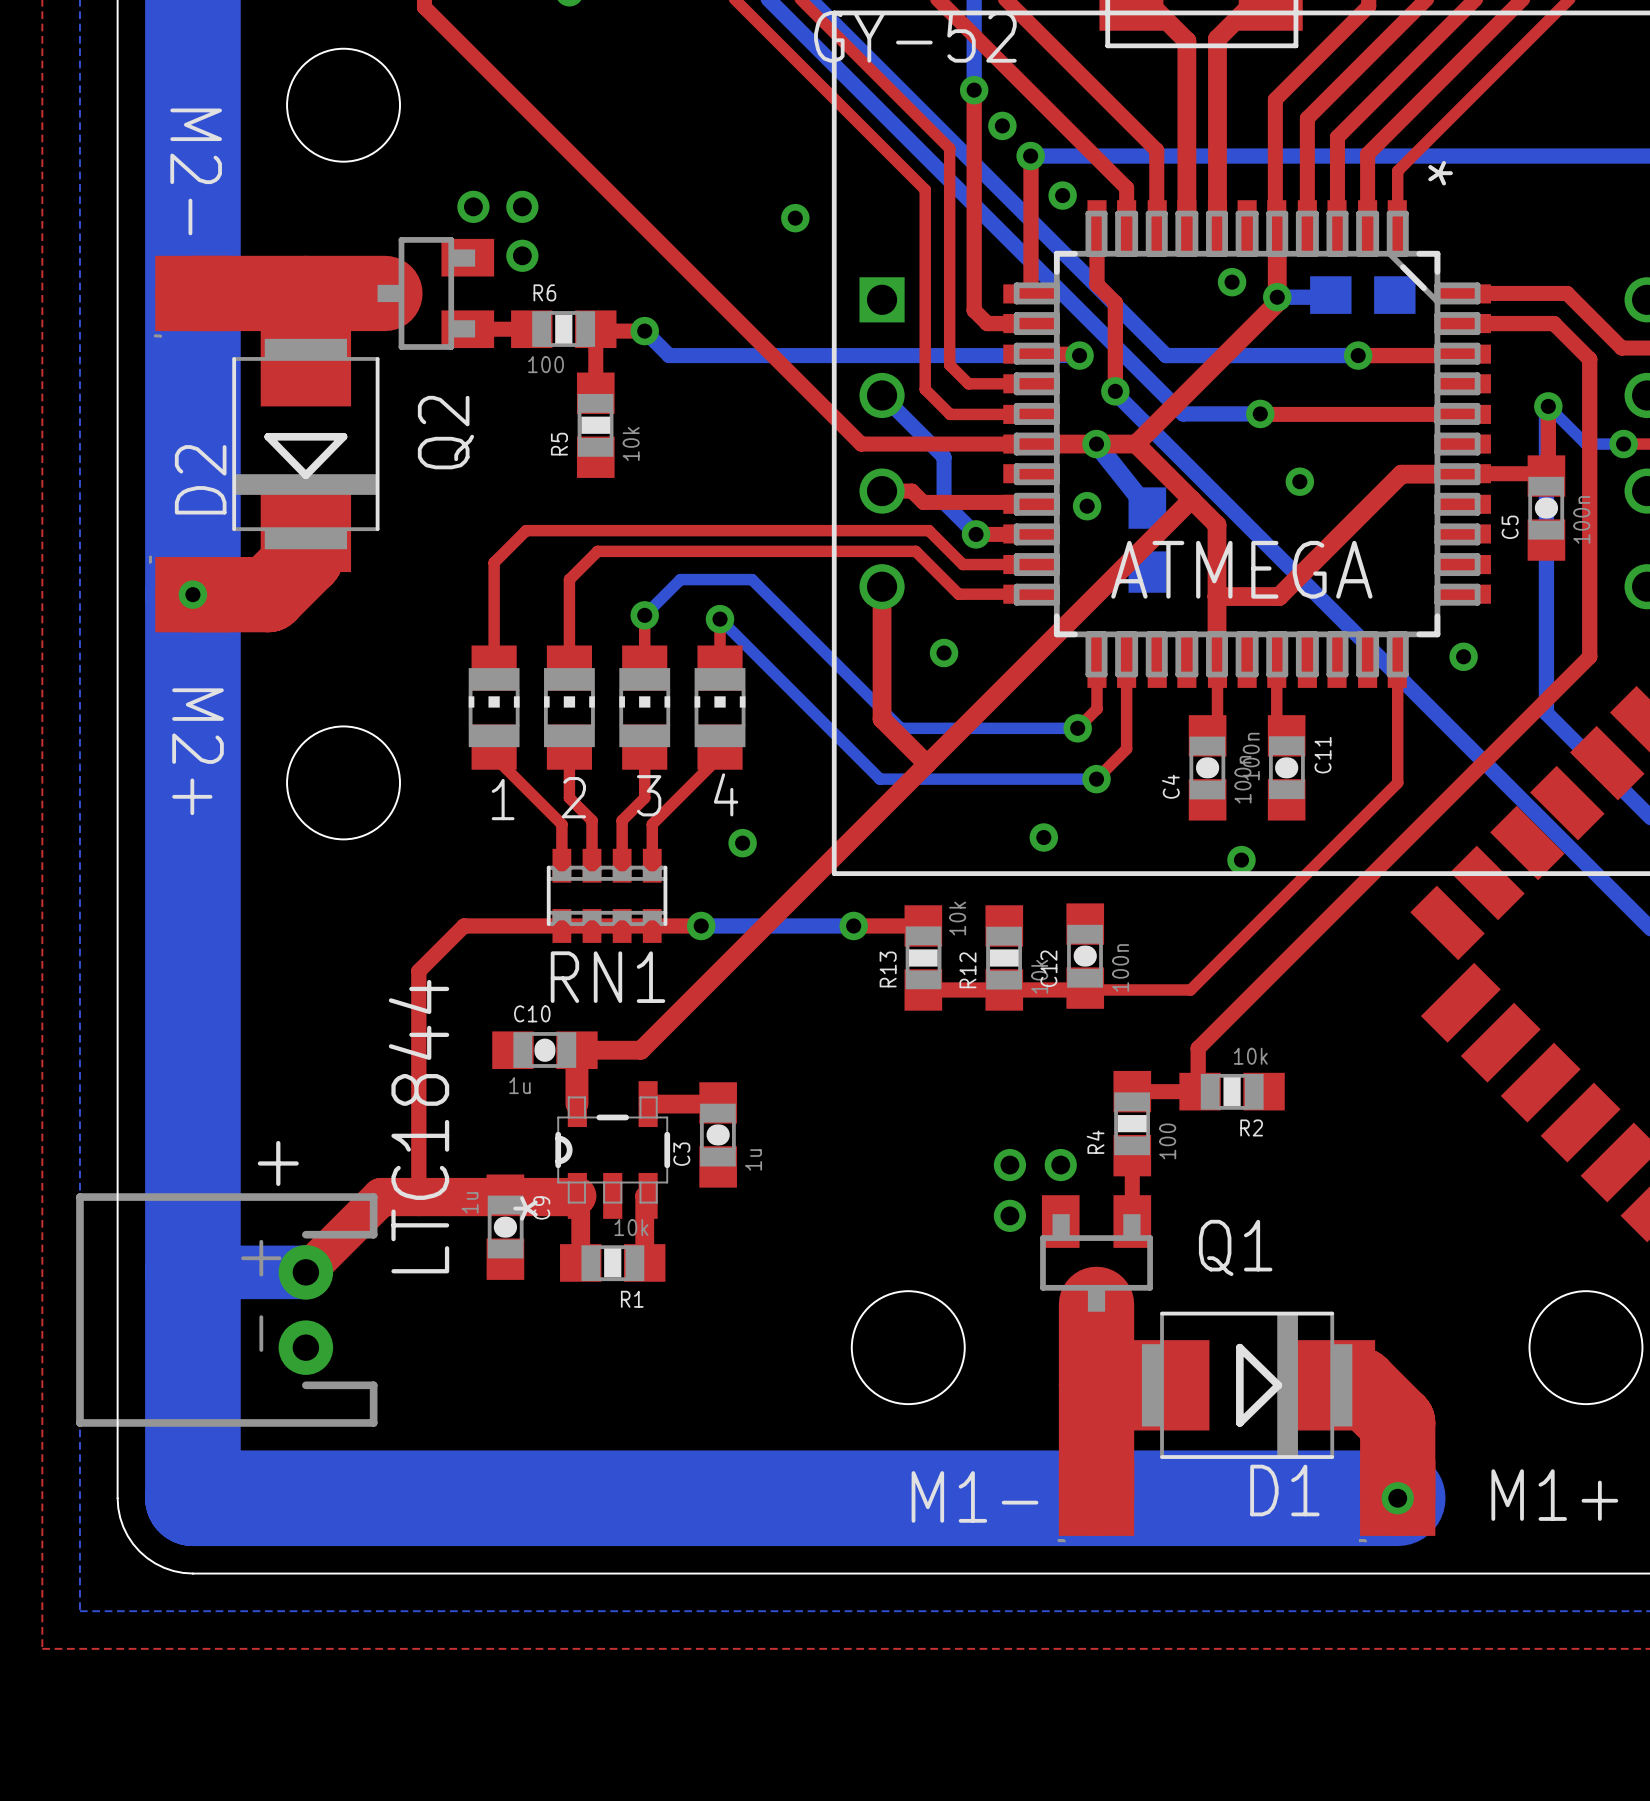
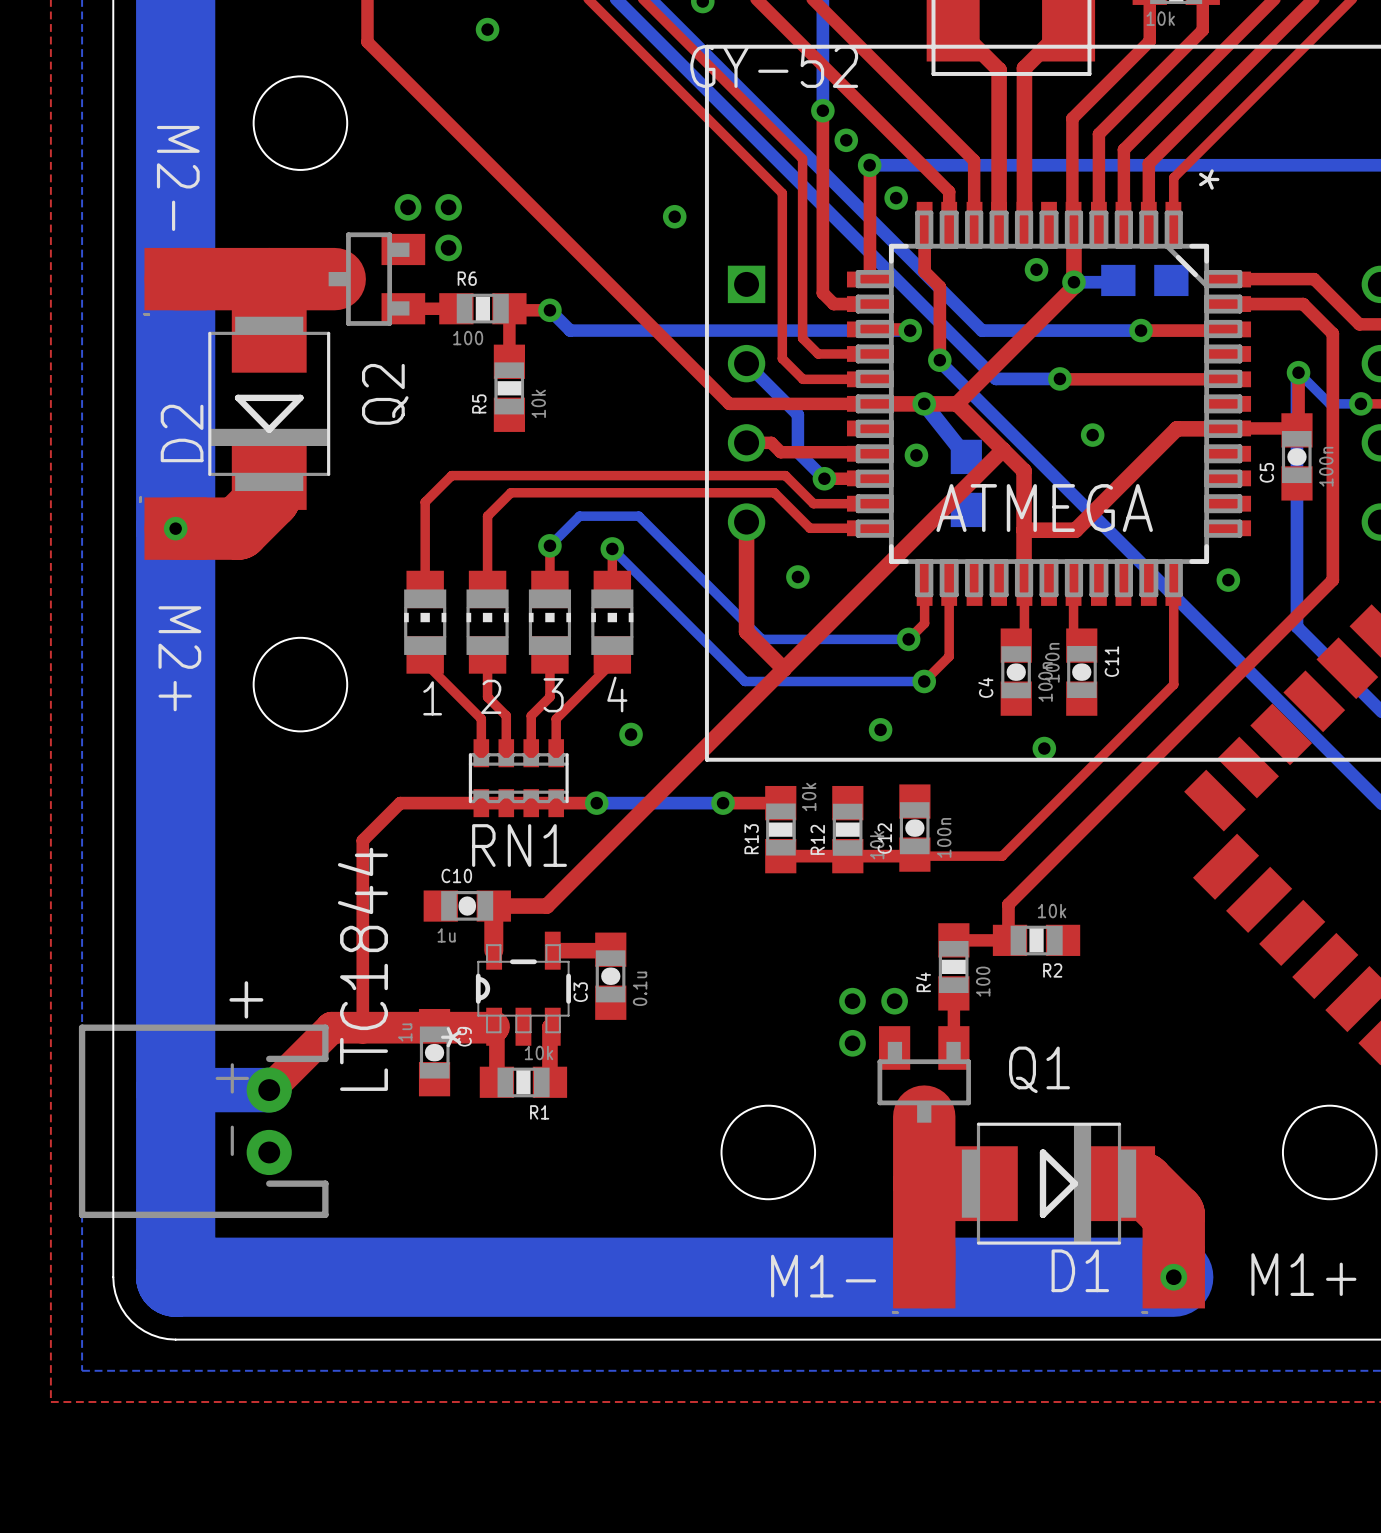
C3 value: 1u (753, 1159) -> 0.1u (640, 988)

